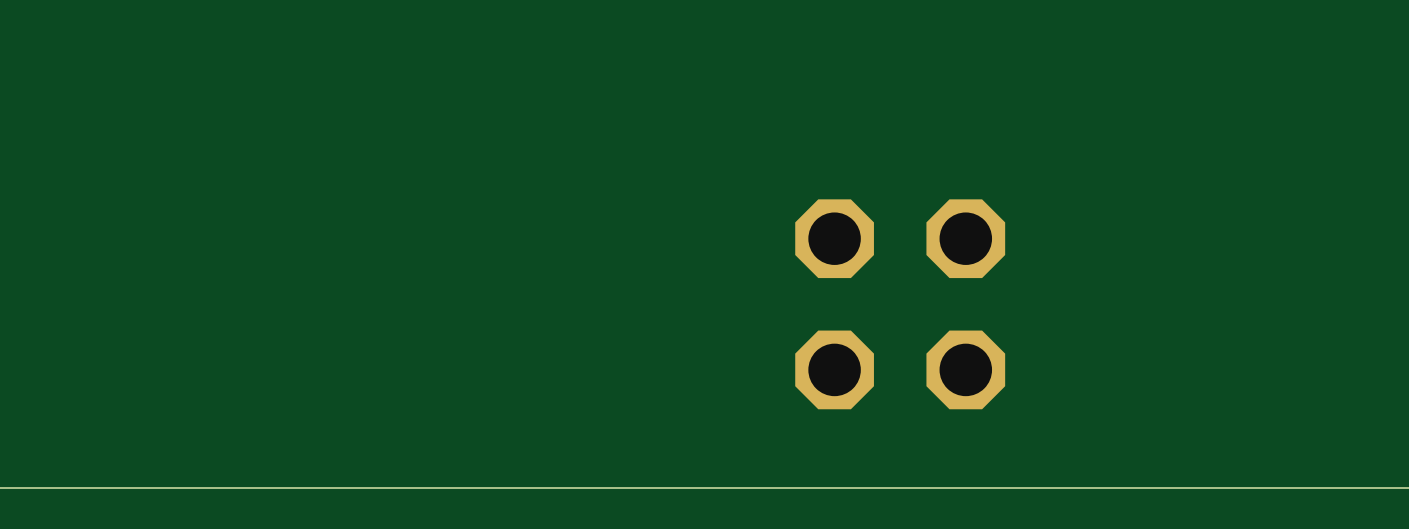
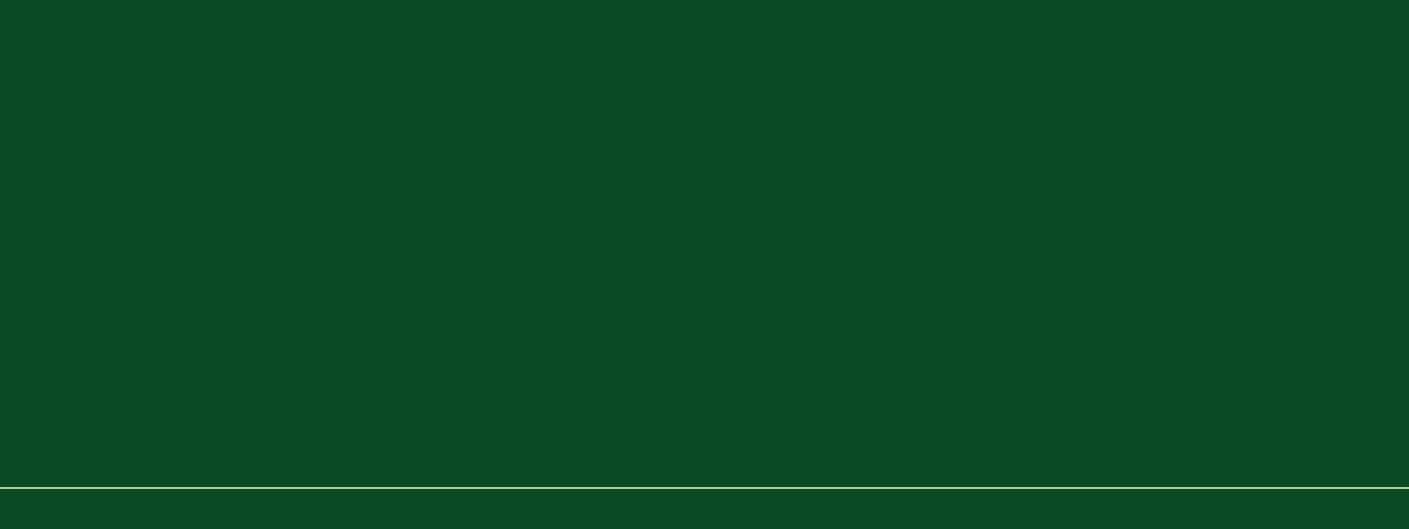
part: (900, 304) -> none

